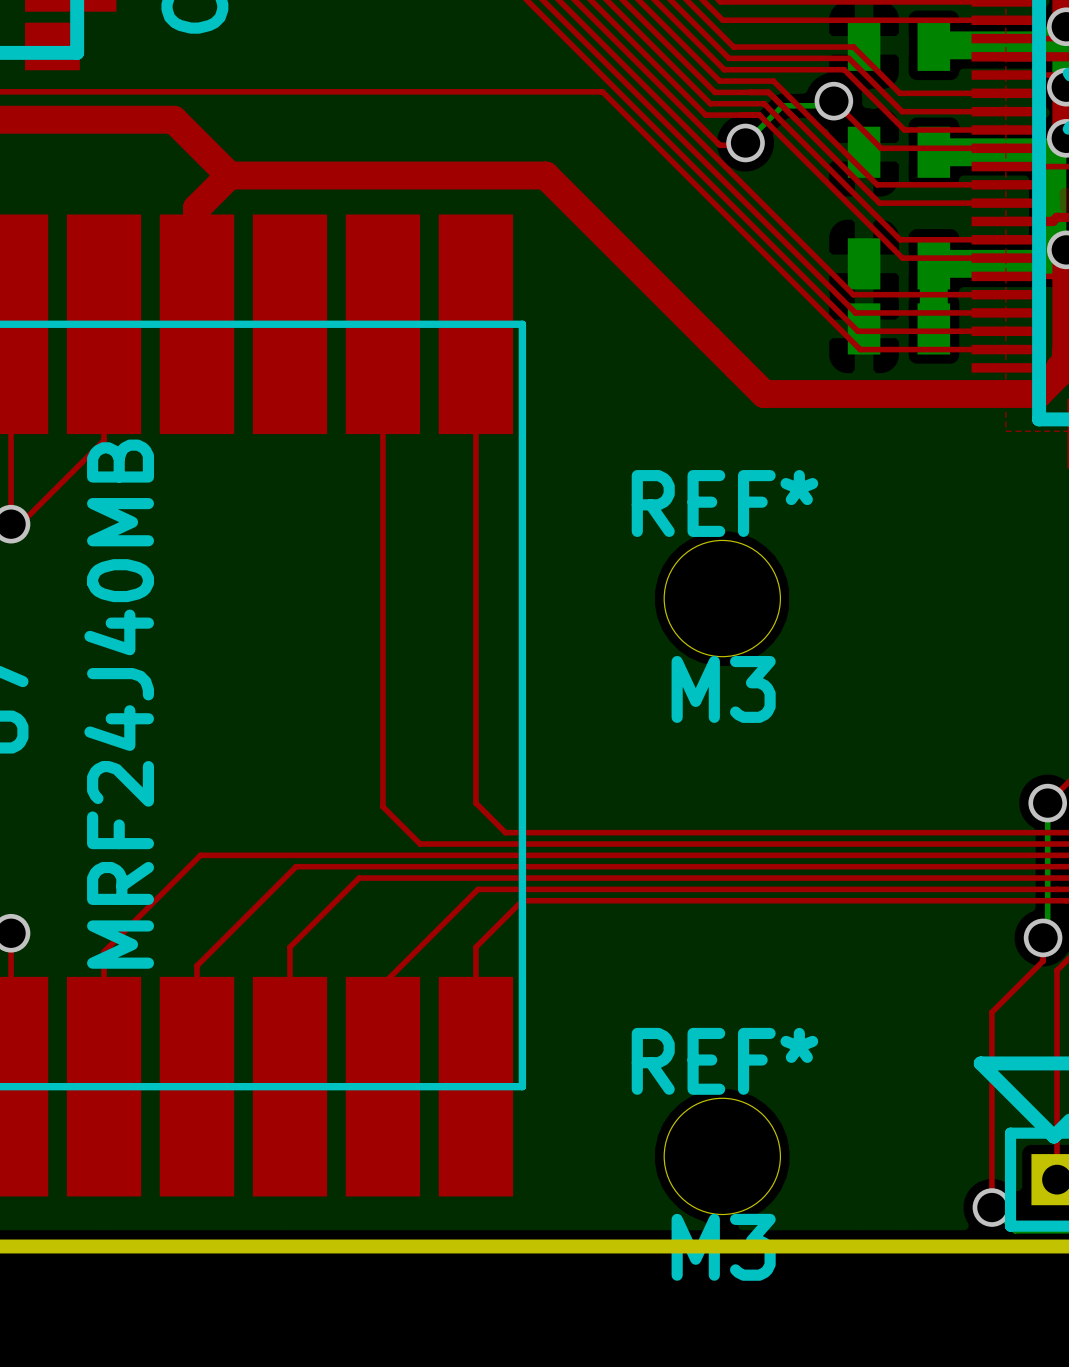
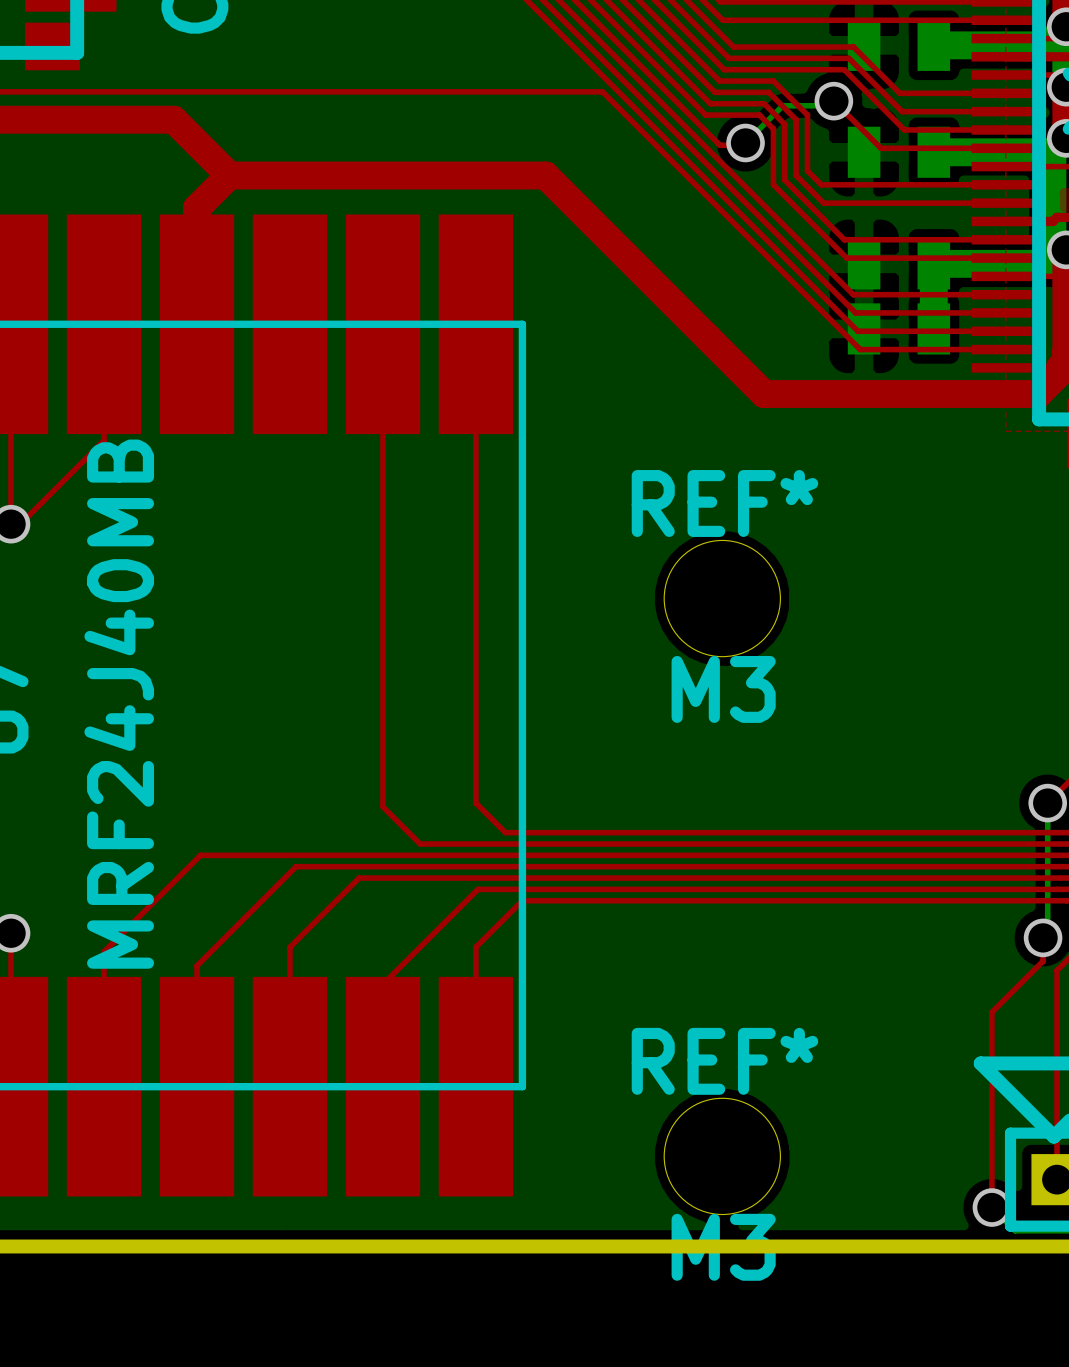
top track: (807, 115) (877, 184) -> (807, 115) (807, 170) (821, 184) (877, 184)
top track: (796, 119) (879, 203) -> (796, 119) (796, 175) (823, 203) (879, 203)
top track: (784, 124) (900, 239) -> (784, 124) (784, 180) (844, 239) (900, 239)
top track: (773, 129) (902, 258) -> (773, 129) (773, 184) (846, 258) (902, 258)

